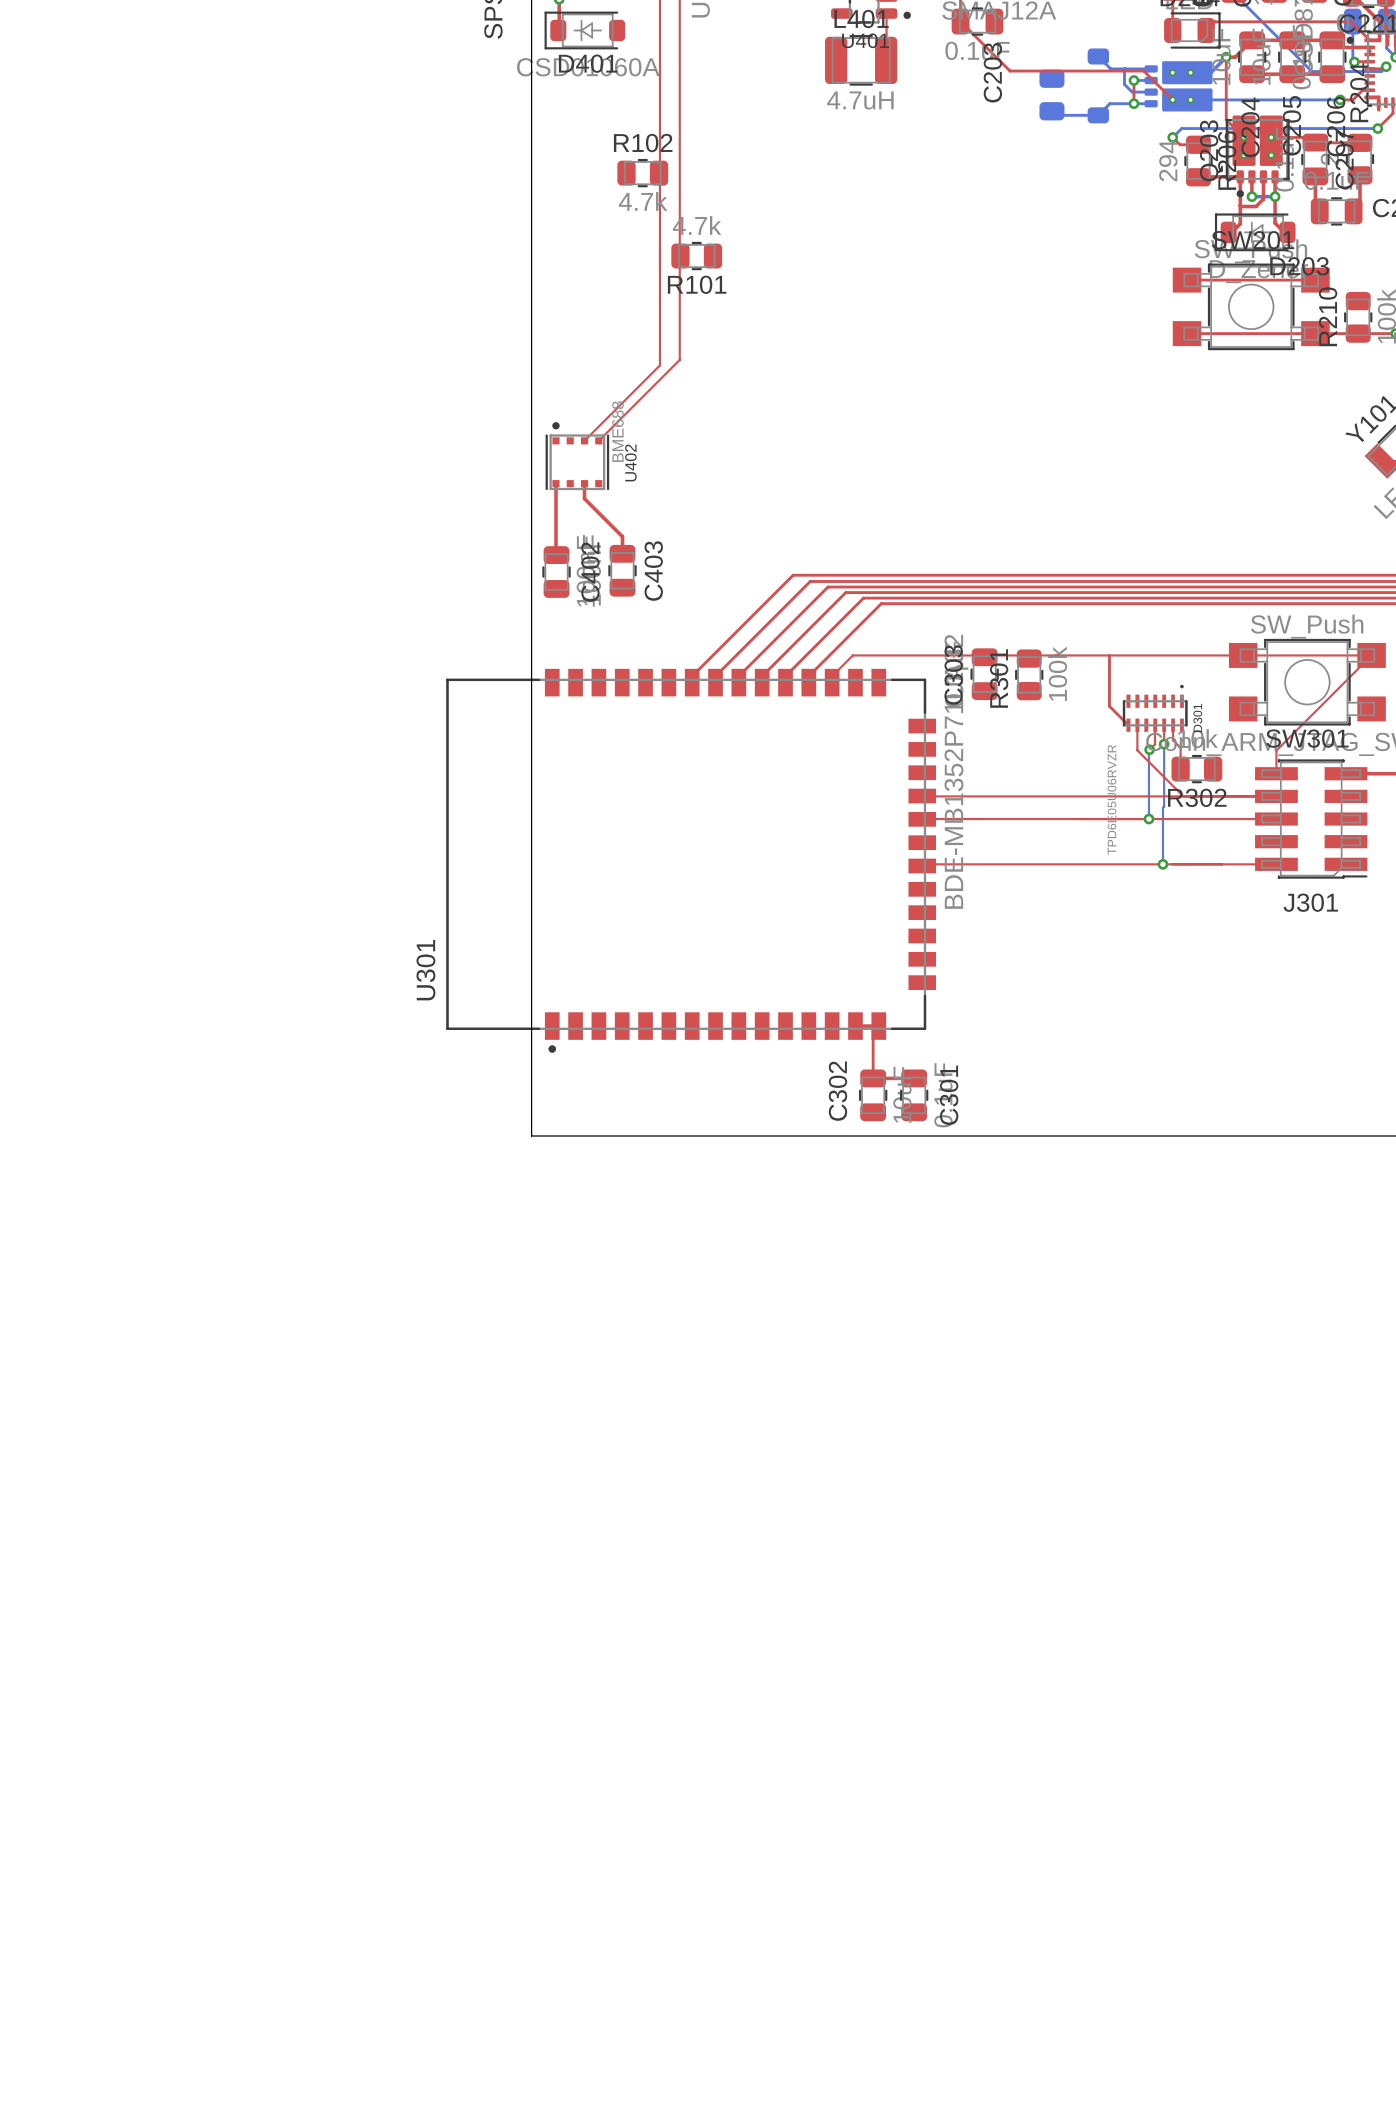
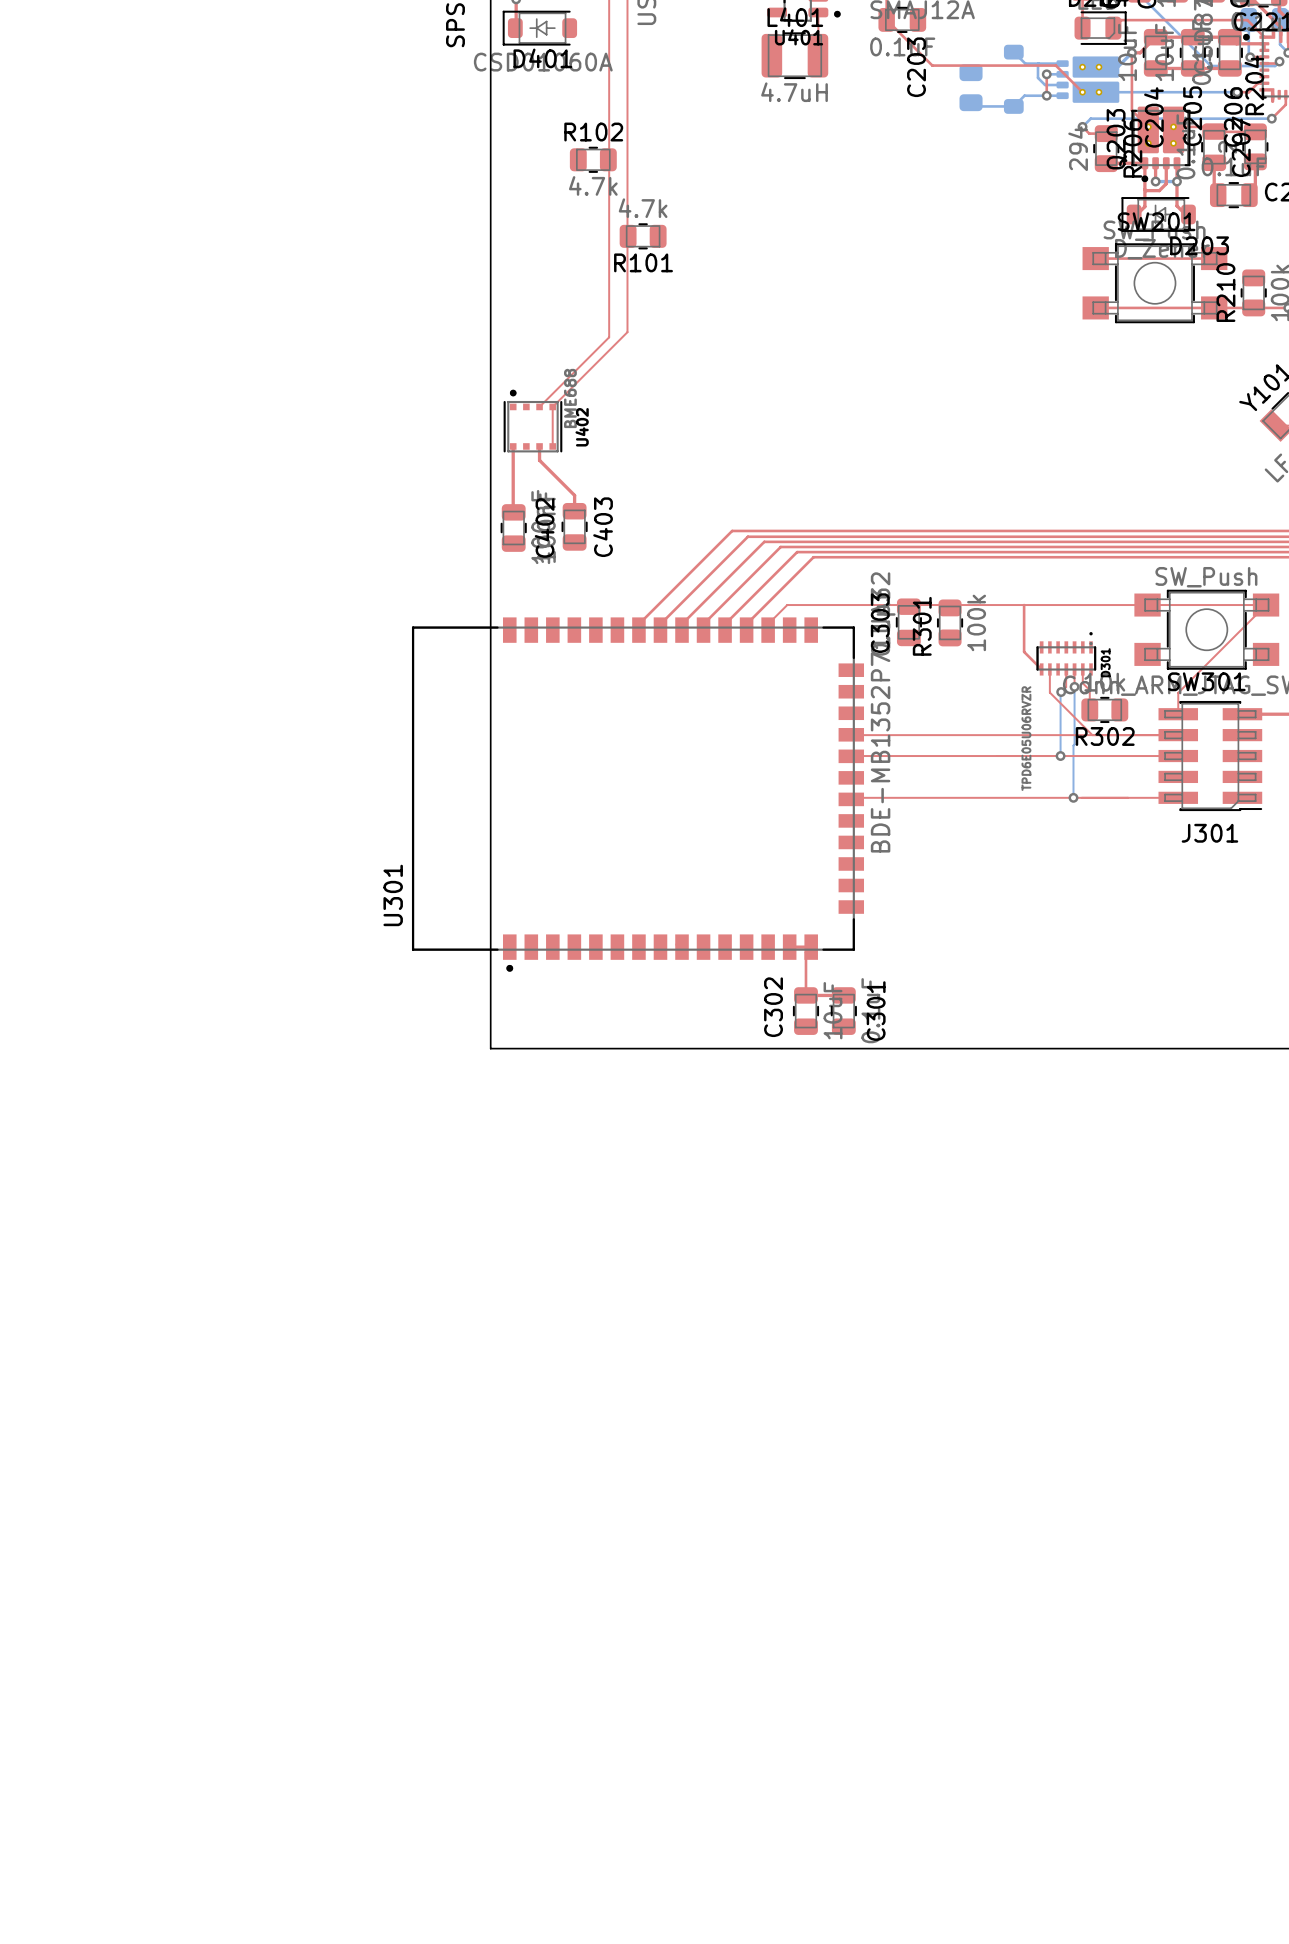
top track: none -> (552, 406) (552, 446)

